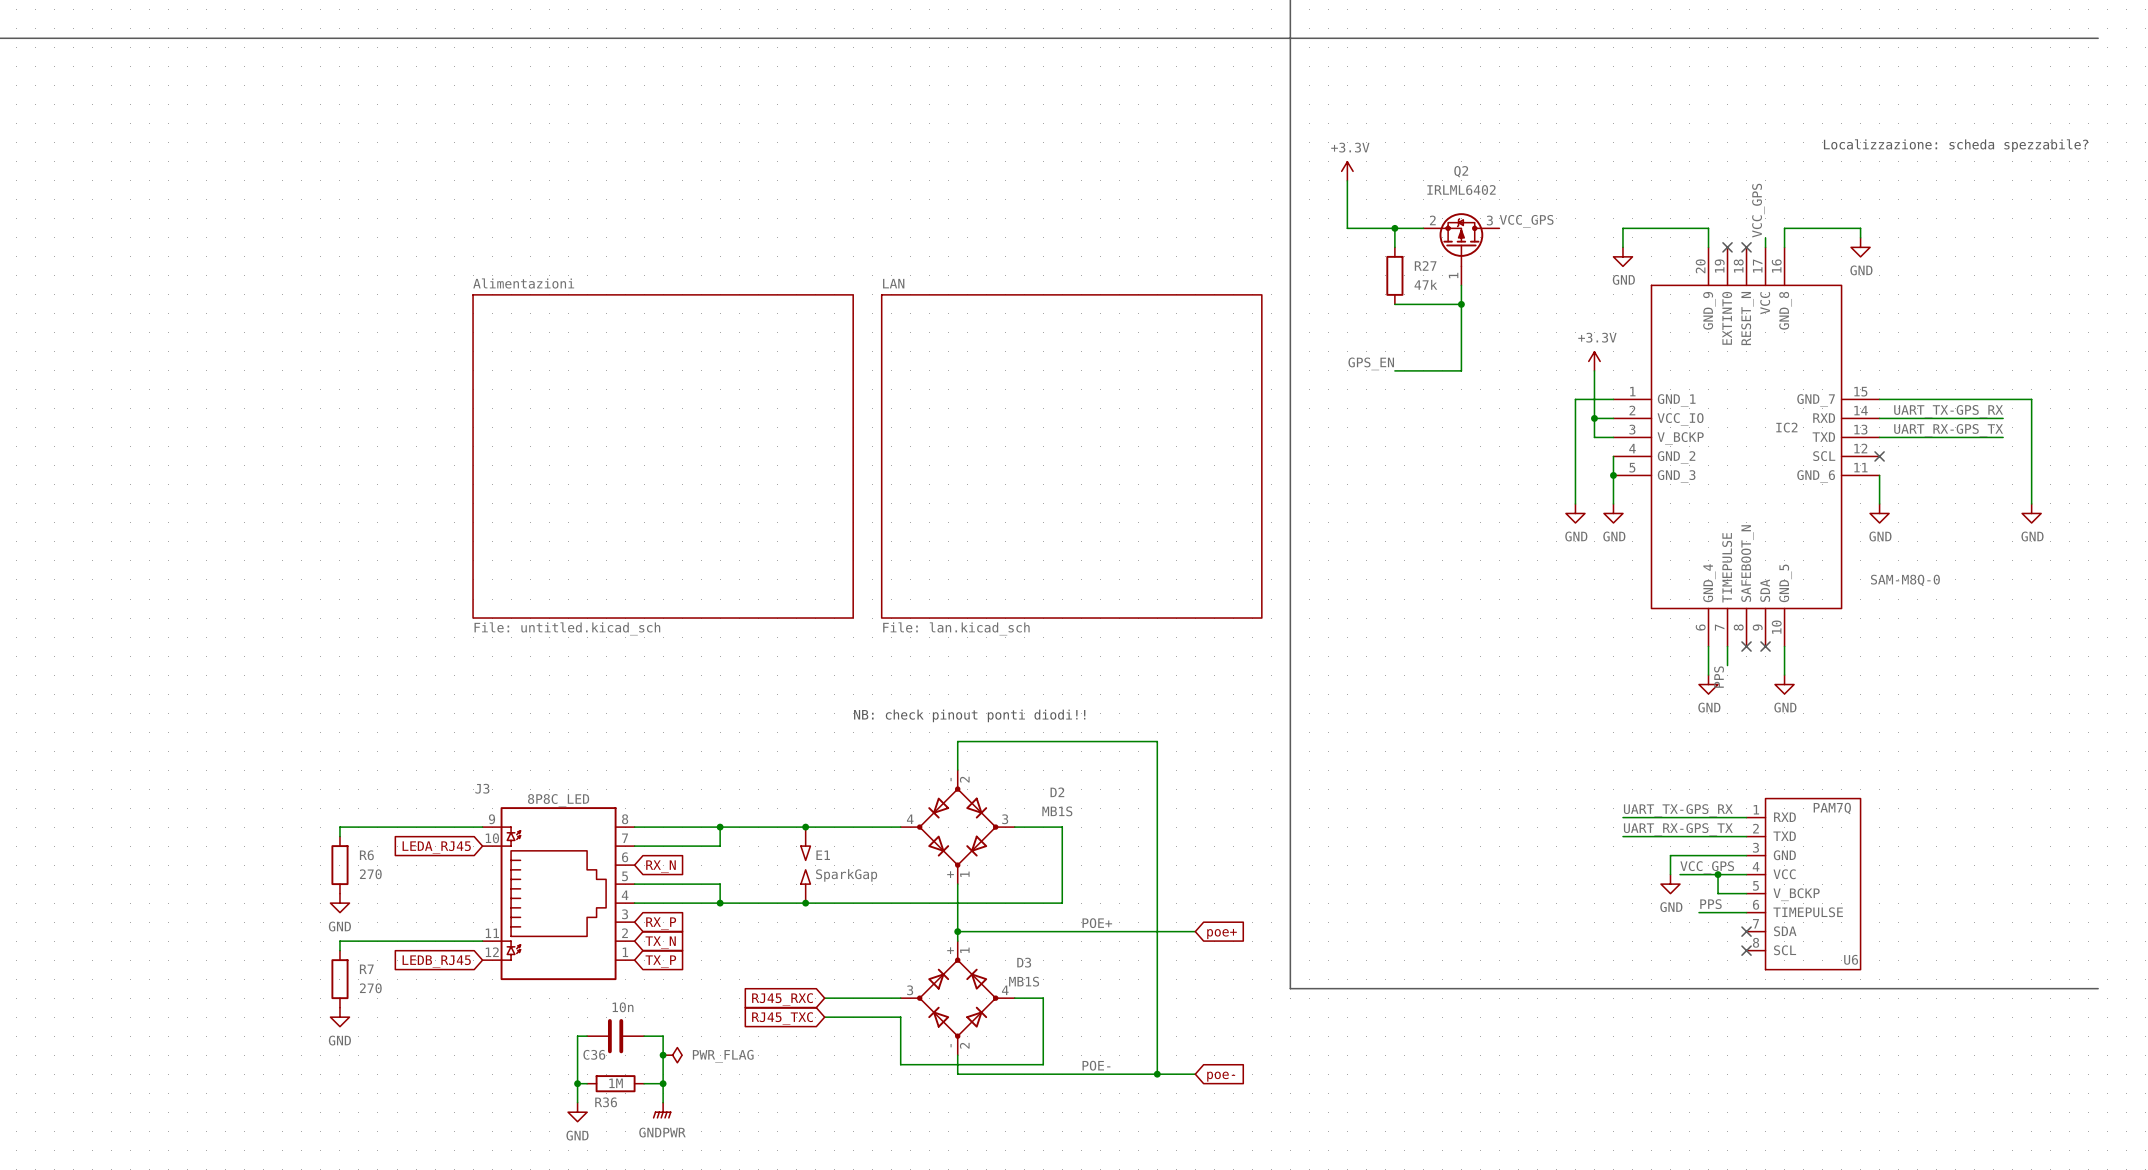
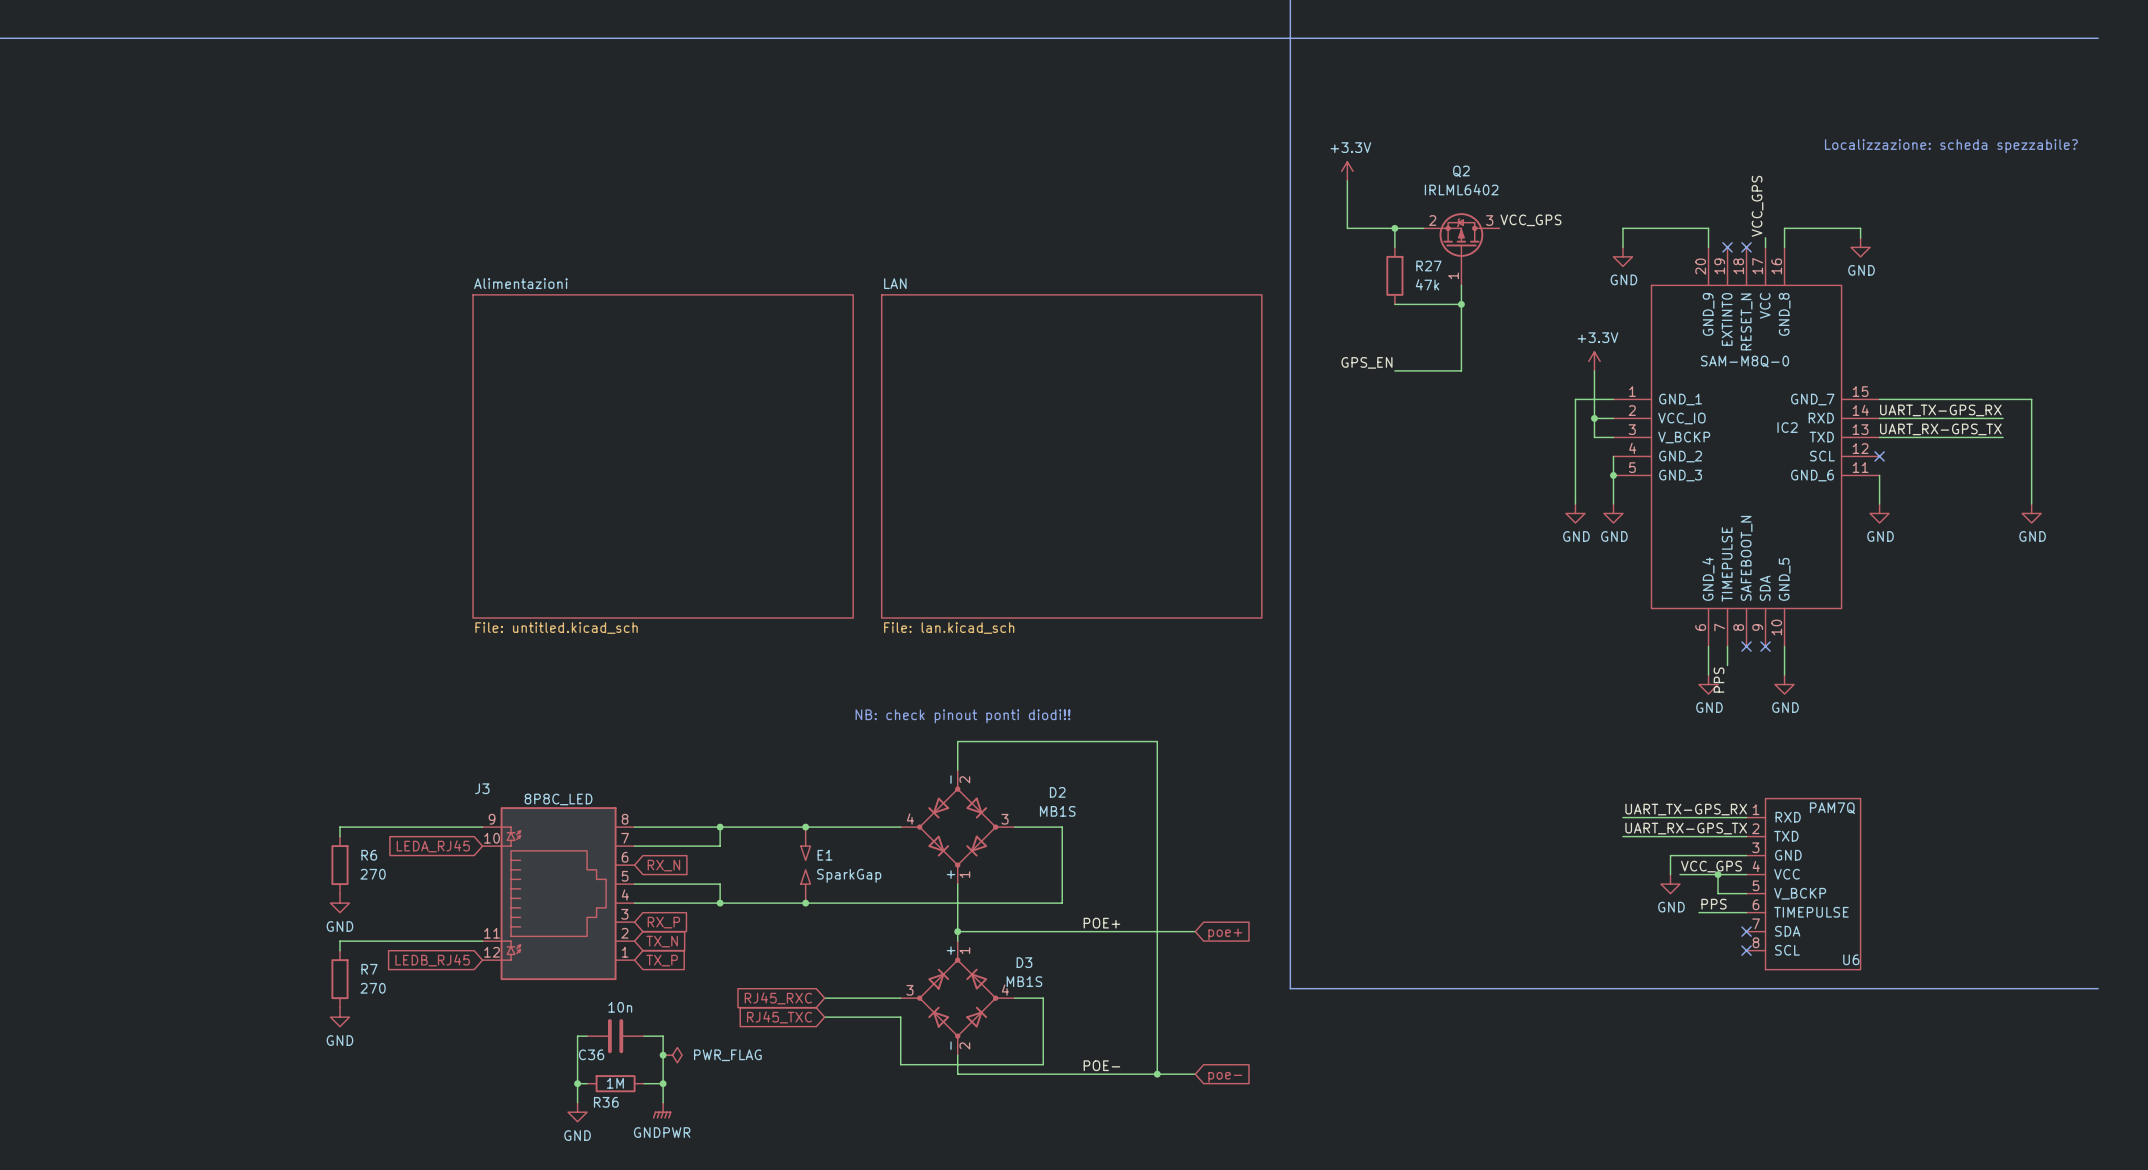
IC2 value position: SAM-M8Q-0 (1905, 580) -> SAM-M8Q-0 (1745, 361)

